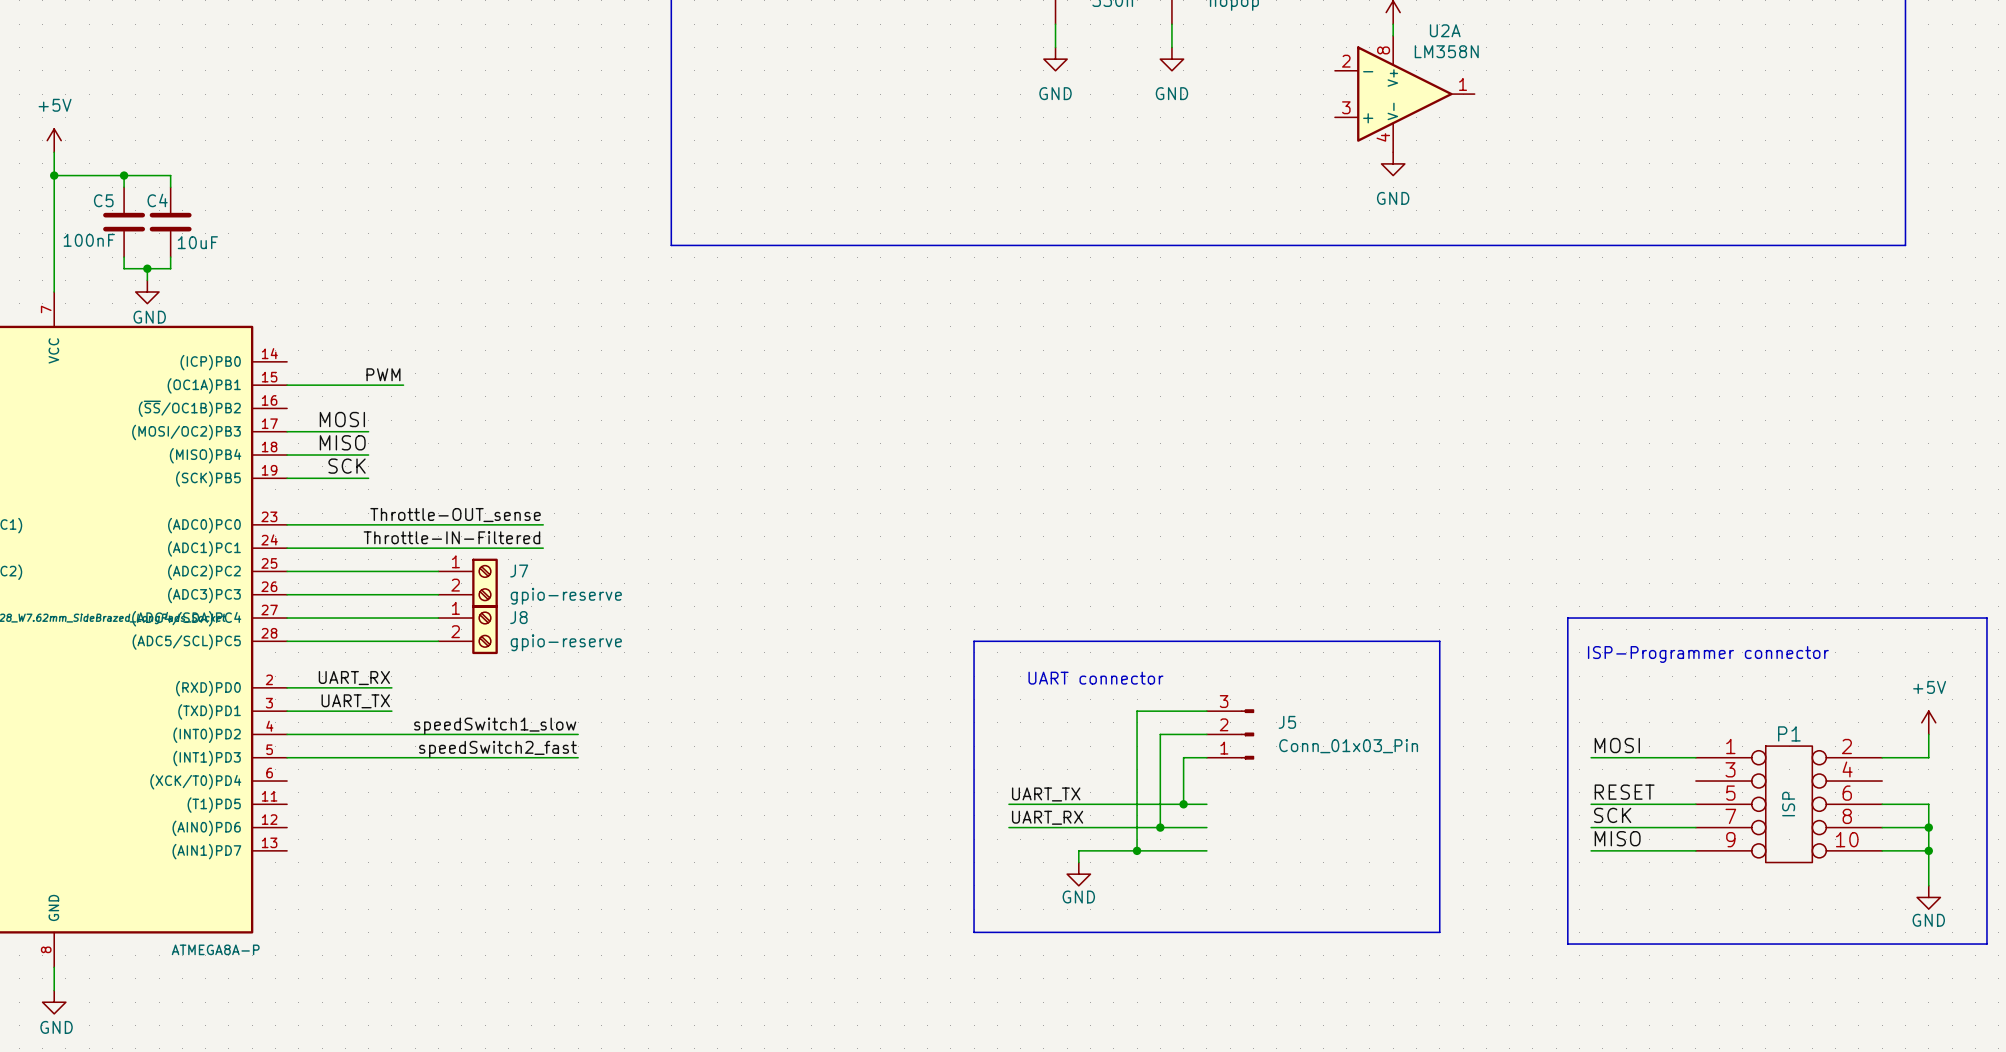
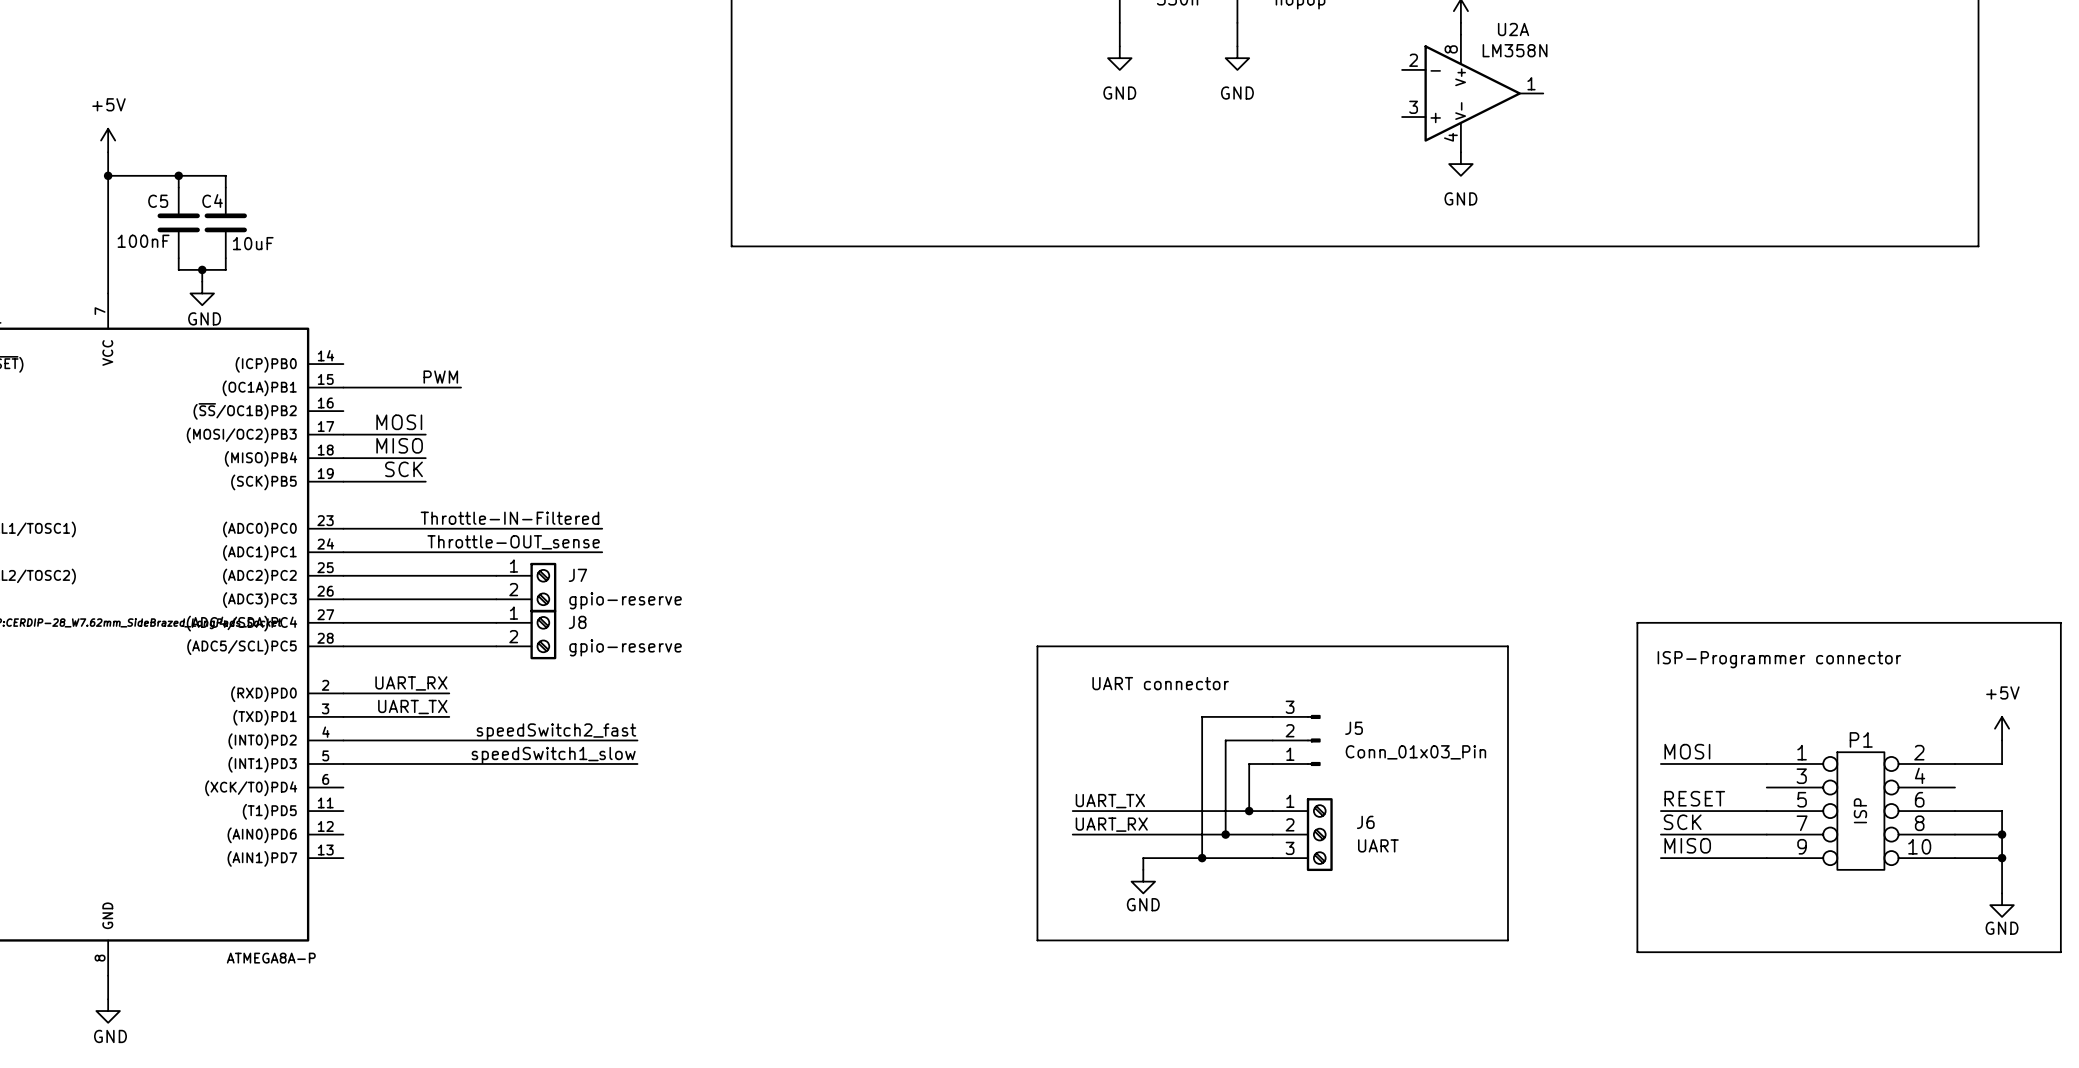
label: Throttle-OUT_sense (455, 515) -> Throttle-IN-Filtered (509, 518)
label: Throttle-IN-Filtered (451, 537) -> Throttle-OUT_sense (513, 542)
label: speedSwitch1_slow (495, 725) -> speedSwitch2_fast (556, 731)
label: speedSwitch2_fast (497, 749) -> speedSwitch1_slow (553, 755)
J6: none -> UART (1302, 834)

